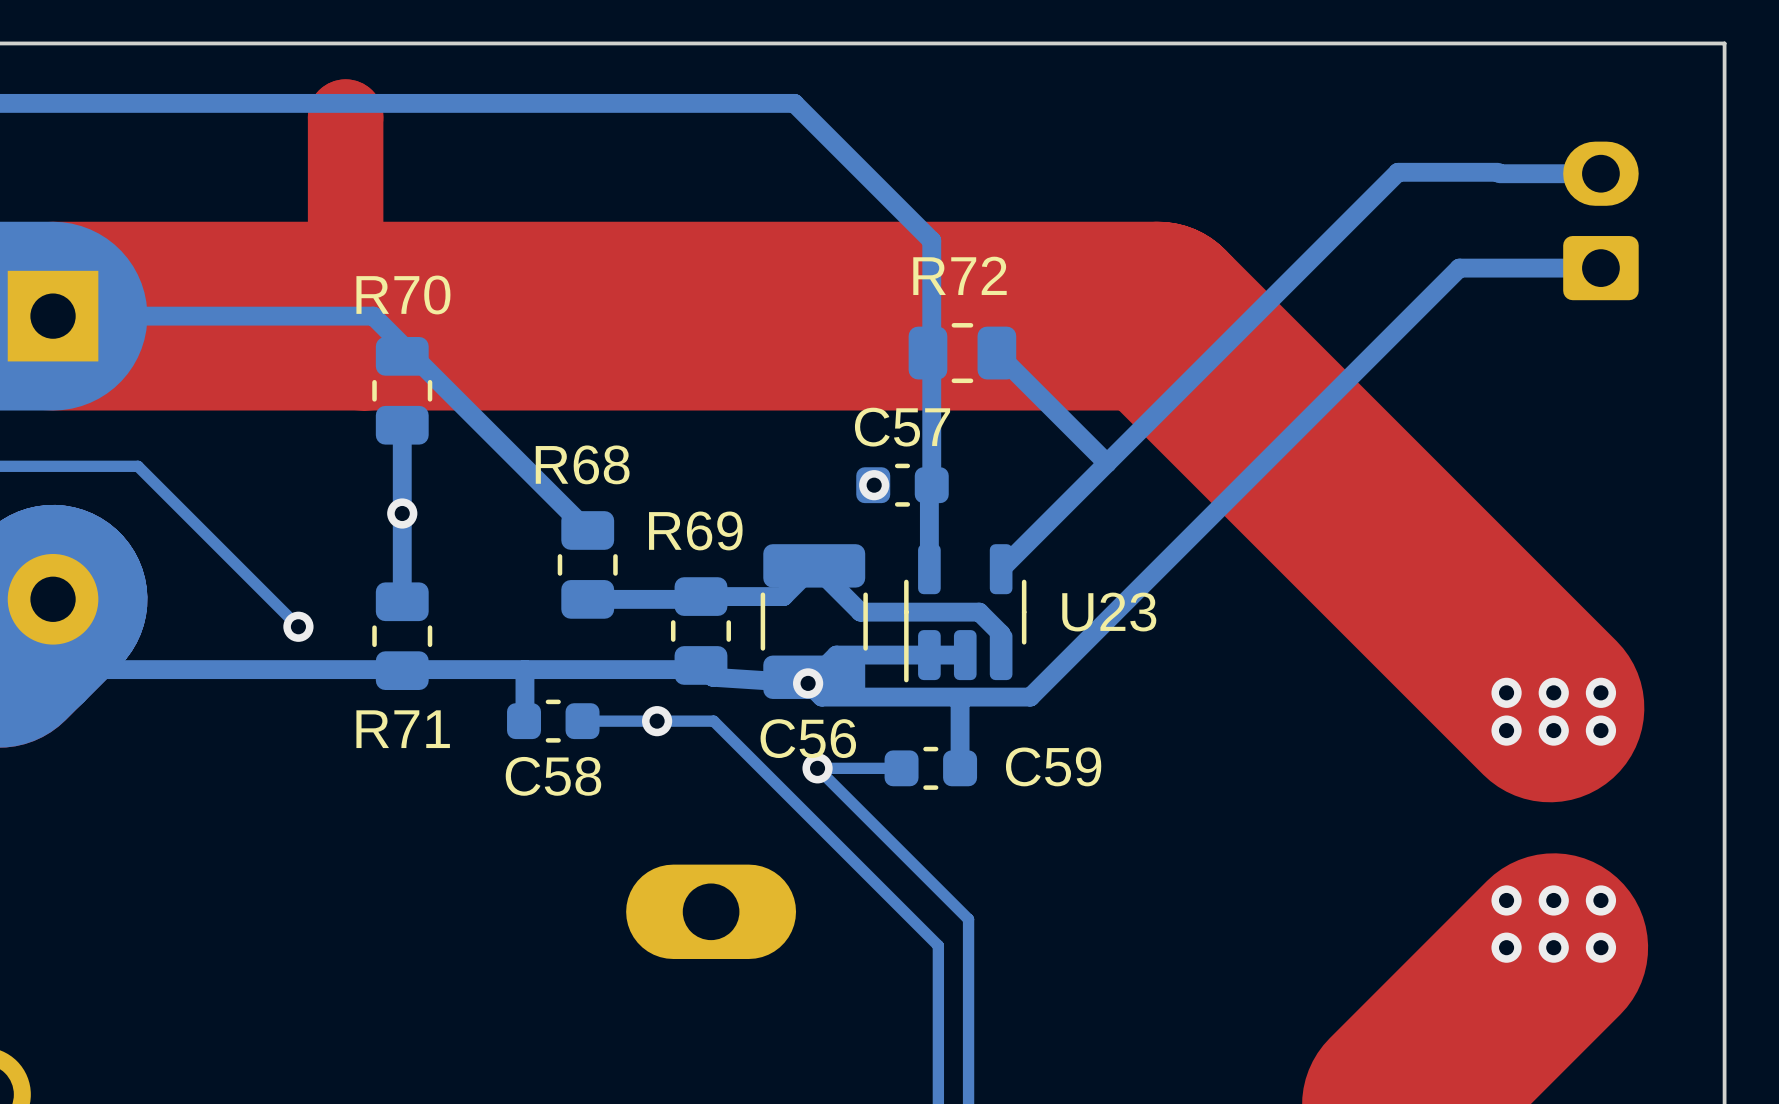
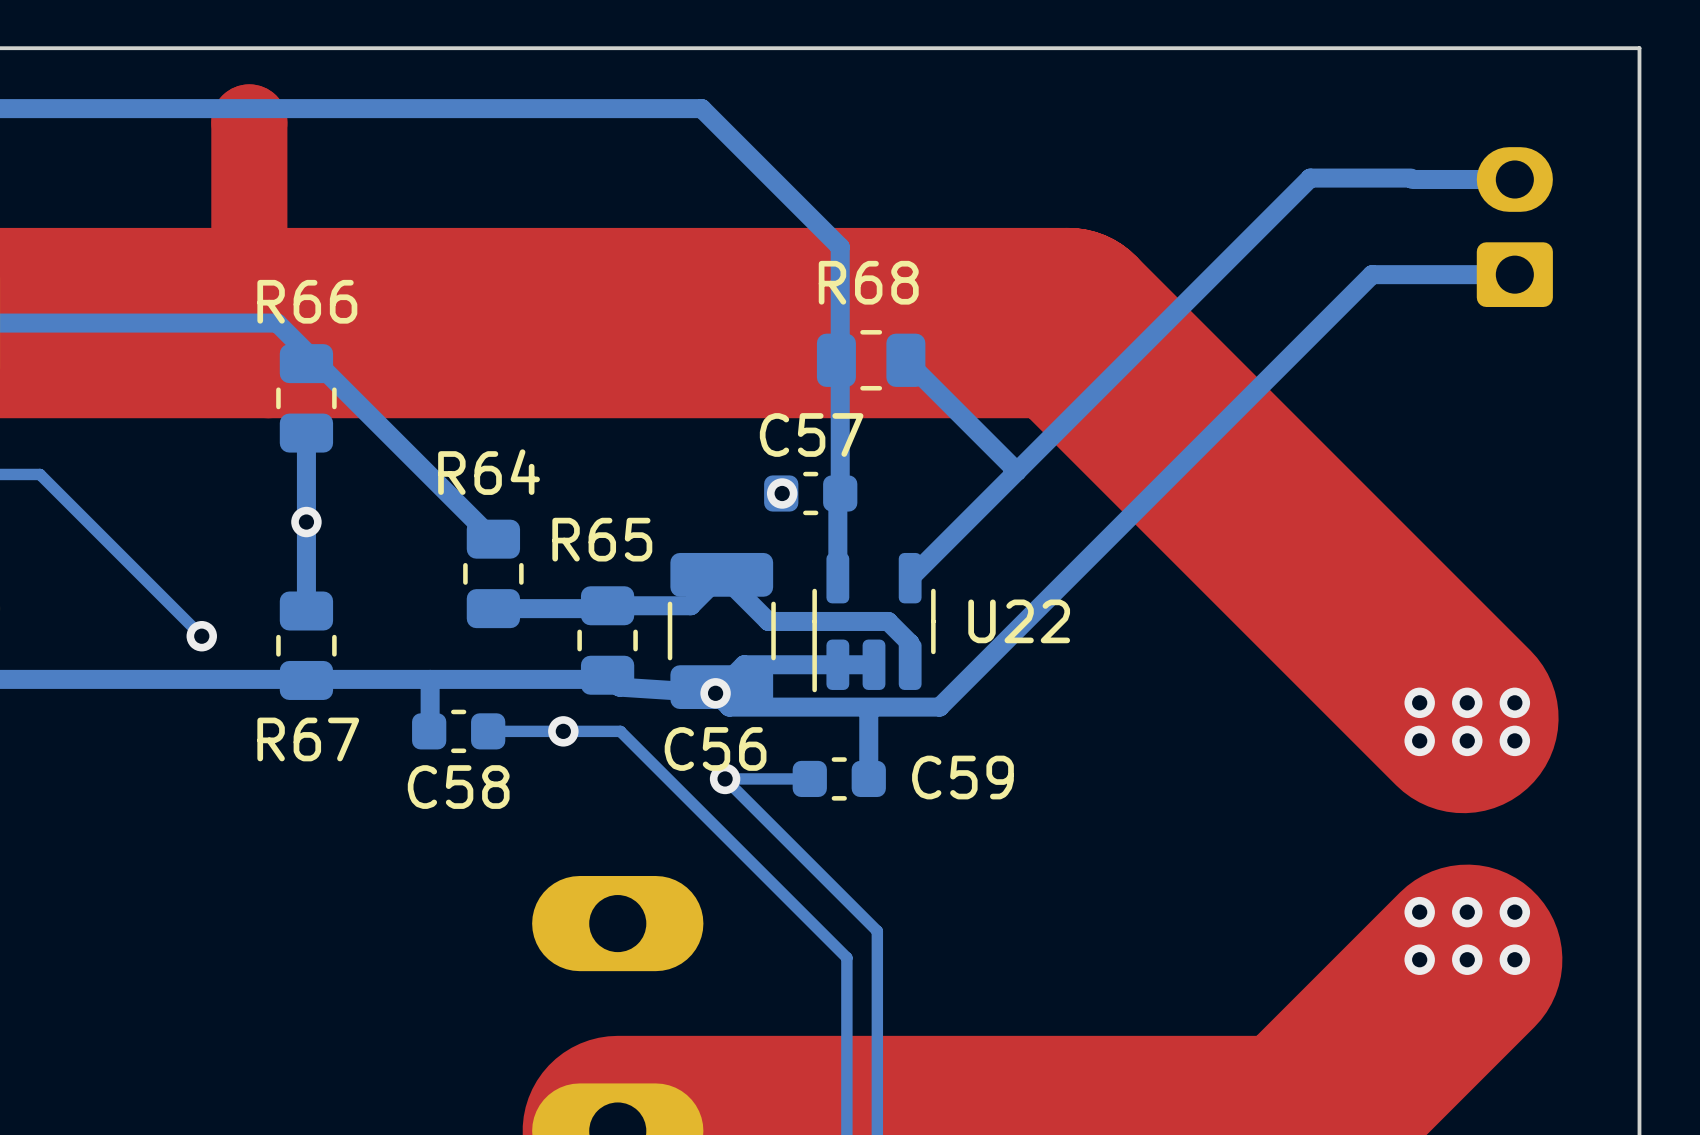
R72 name: R72 (960, 275) -> R68 (868, 282)
R70 name: R70 (403, 294) -> R66 (307, 301)
R68 name: R68 (582, 464) -> R64 (489, 472)
R69 name: R69 (695, 530) -> R65 (602, 539)
U23 name: U23 (1109, 612) -> U22 (1019, 621)
R71 name: R71 (403, 729) -> R67 (308, 739)

